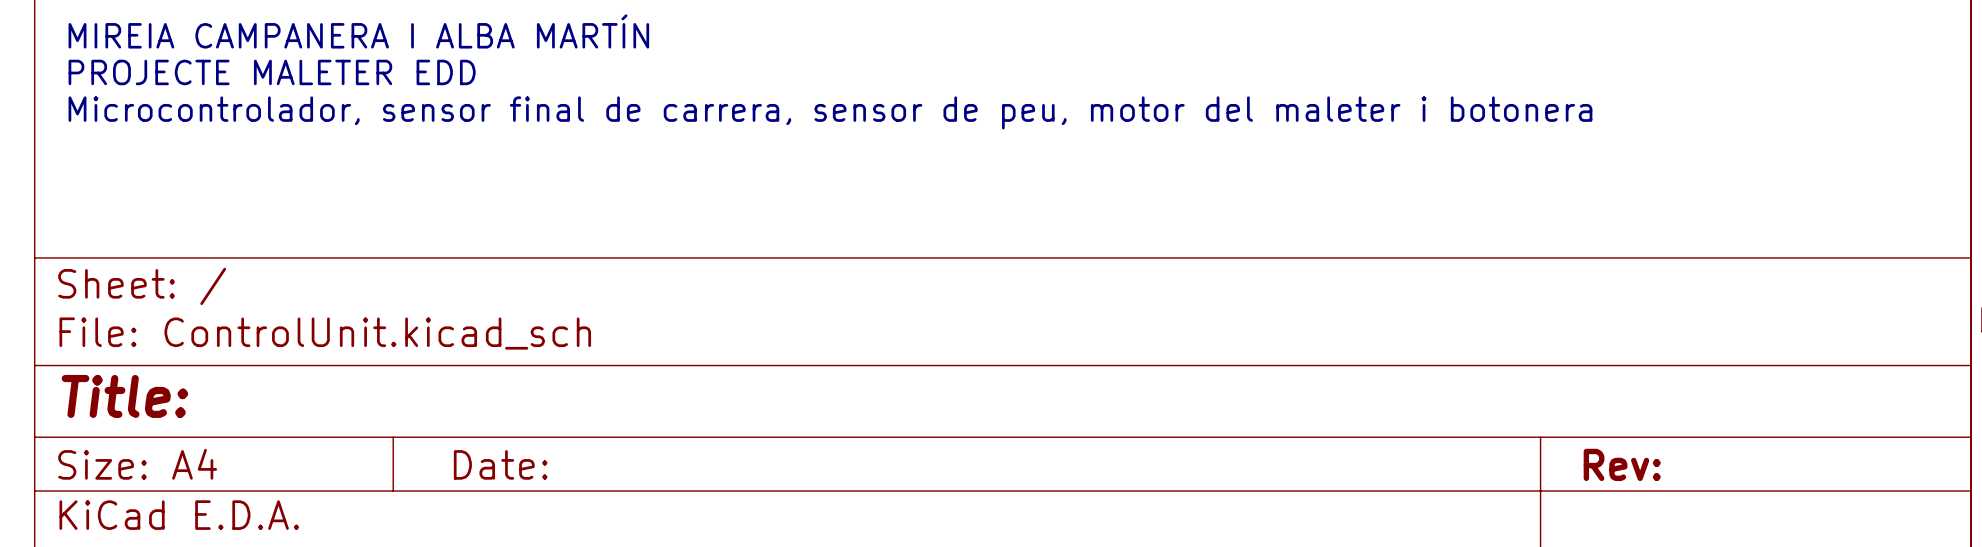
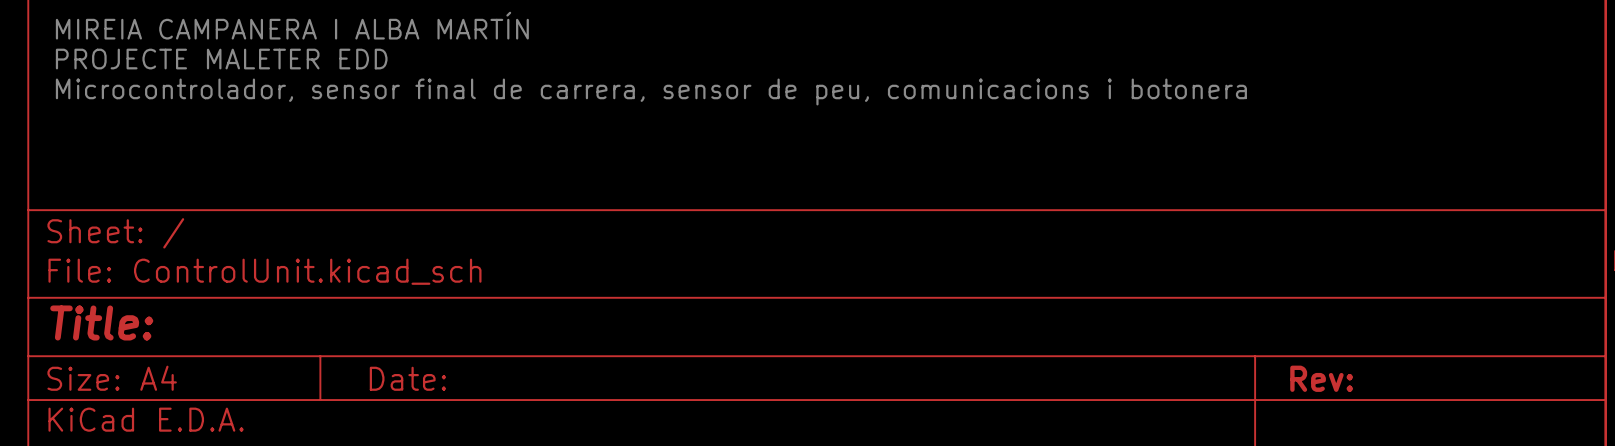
text: Microcontrolador, sensor final de carrera, sensor de peu, motor del maleter i botonera (830, 112) -> Microcontrolador, sensor final de carrera, sensor de peu, comunicacions i botonera (651, 91)

